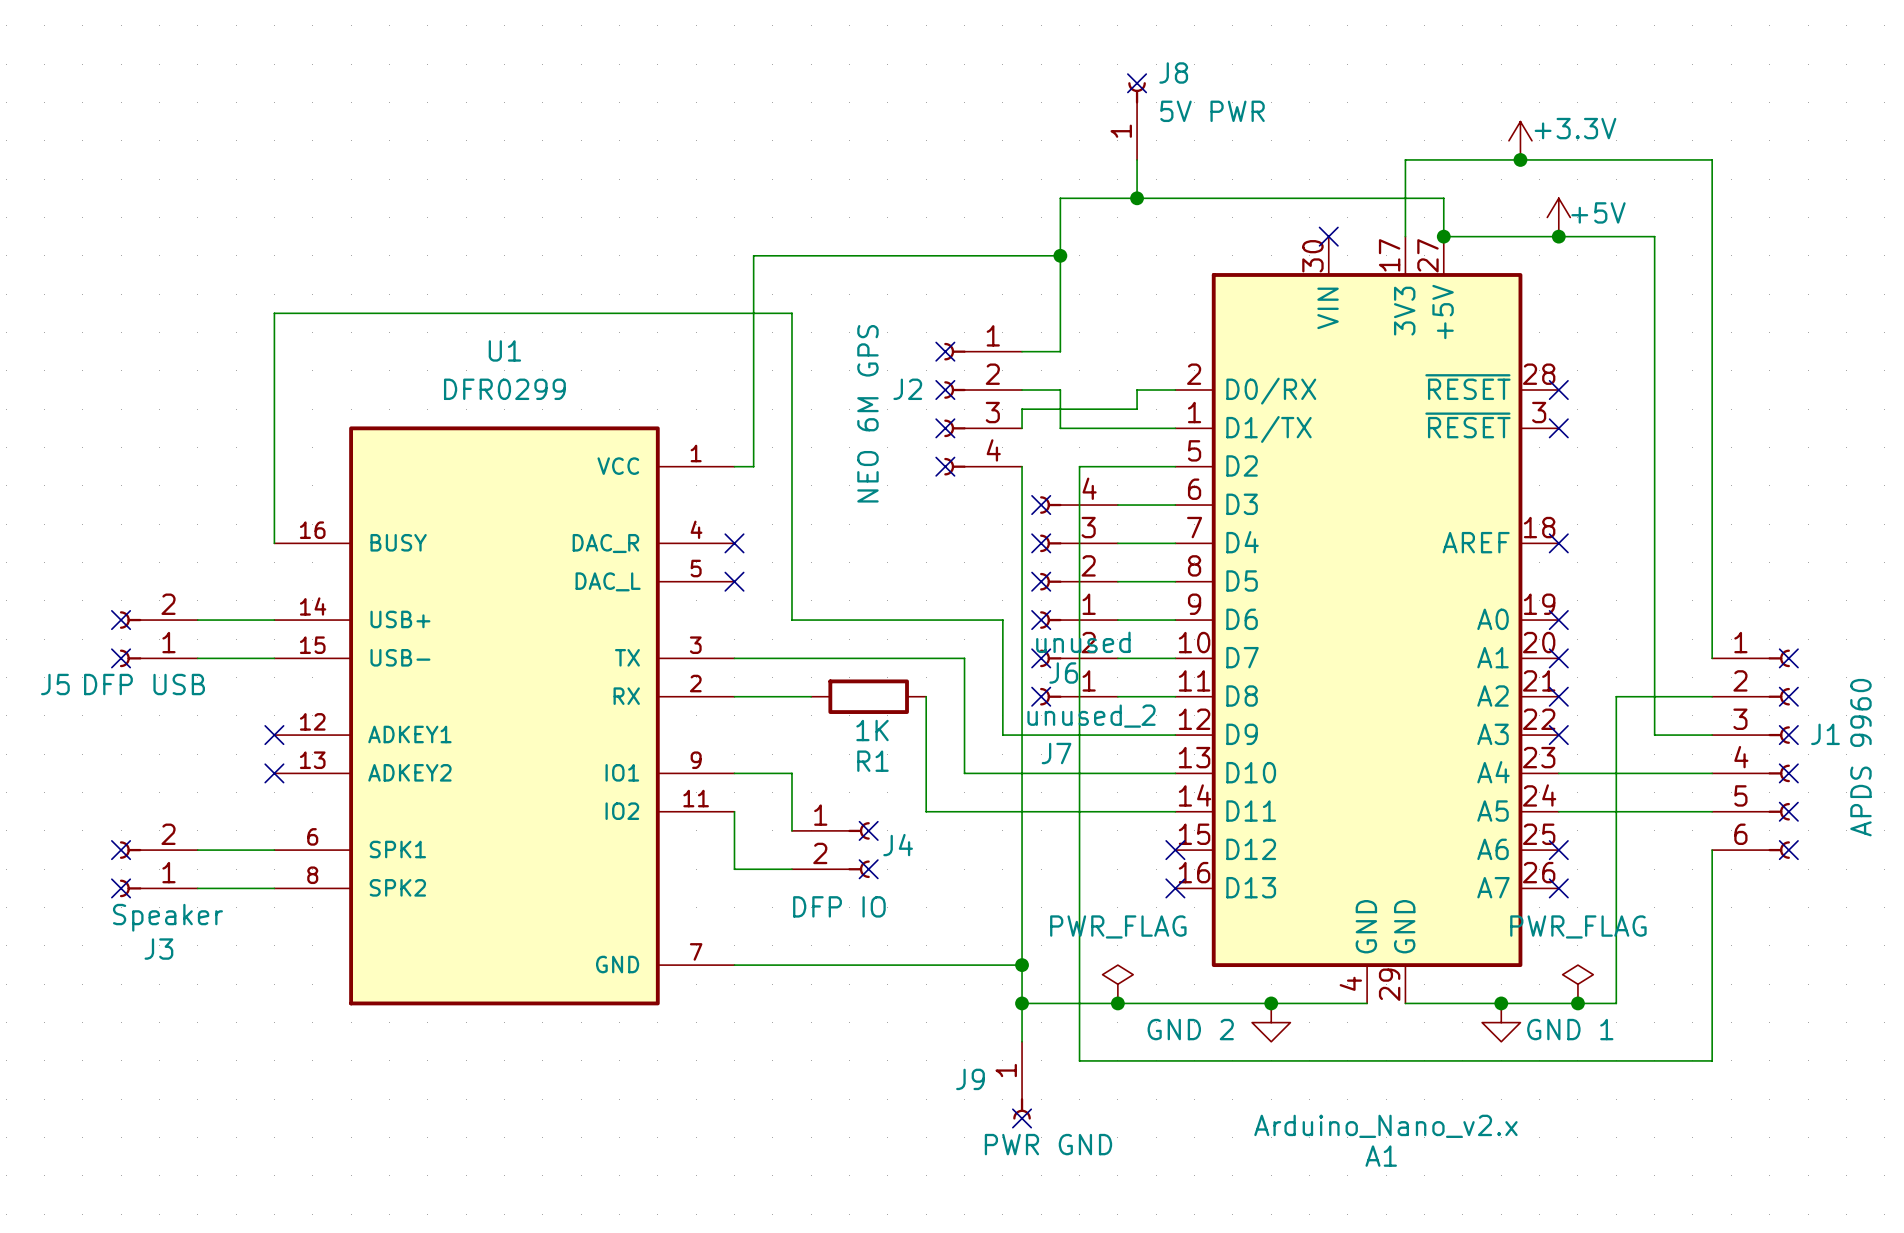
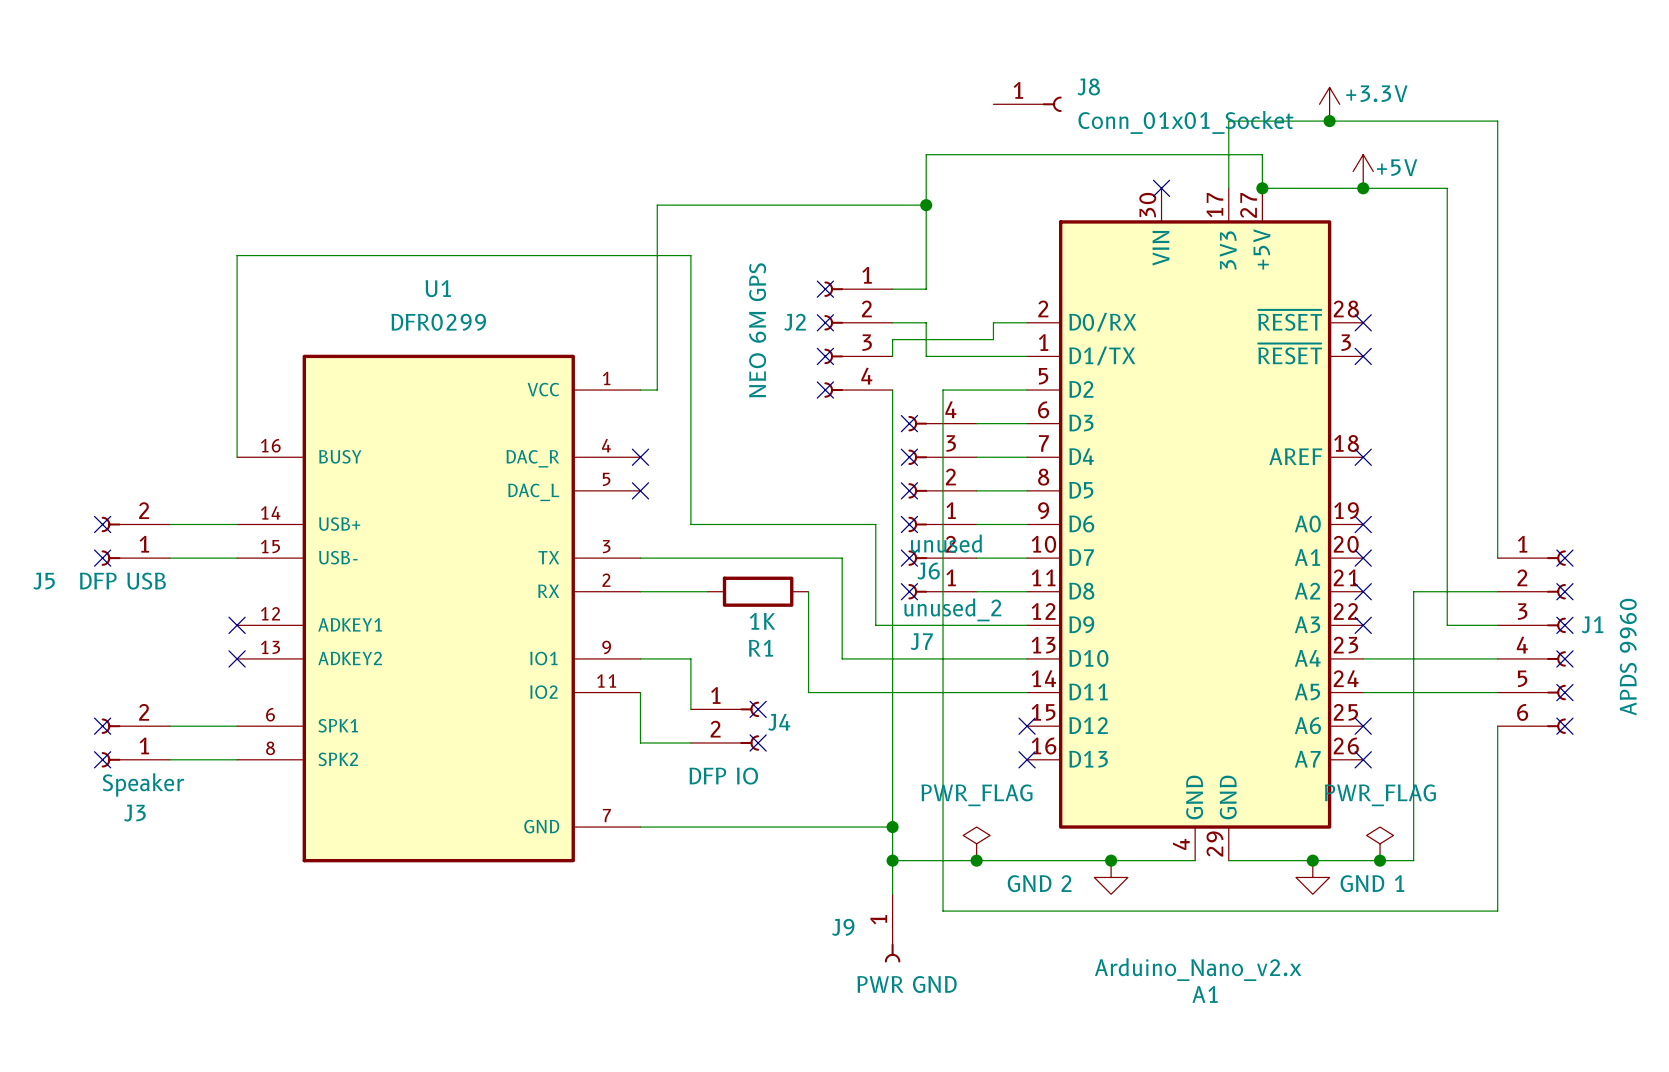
J8 name position: J8 (1173, 72) -> J8 (1088, 86)
no-connect mark: (1137, 83) -> none
J8 rotation: 0° (1137, 92) -> 90° clockwise (1052, 104)
J8 value: 5V PWR (1212, 111) -> Conn_01x01_Socket (1185, 122)
wire: (1137, 159) (1137, 198) -> none
junction: (1137, 198) -> none
no-connect mark: (1022, 1118) -> none

